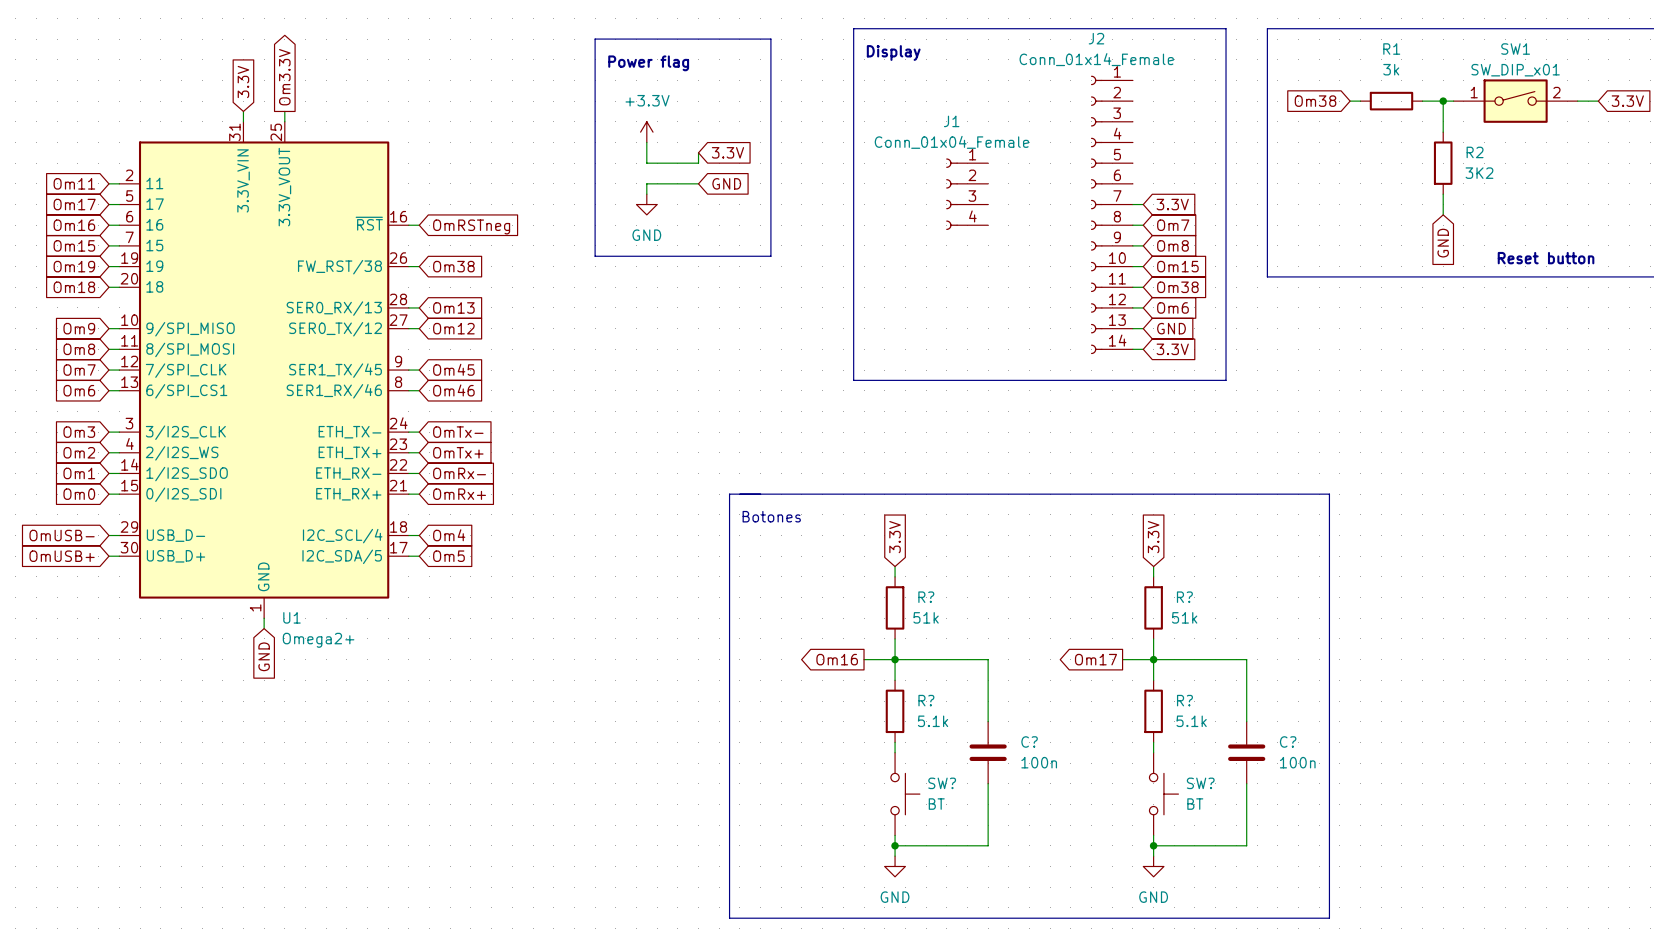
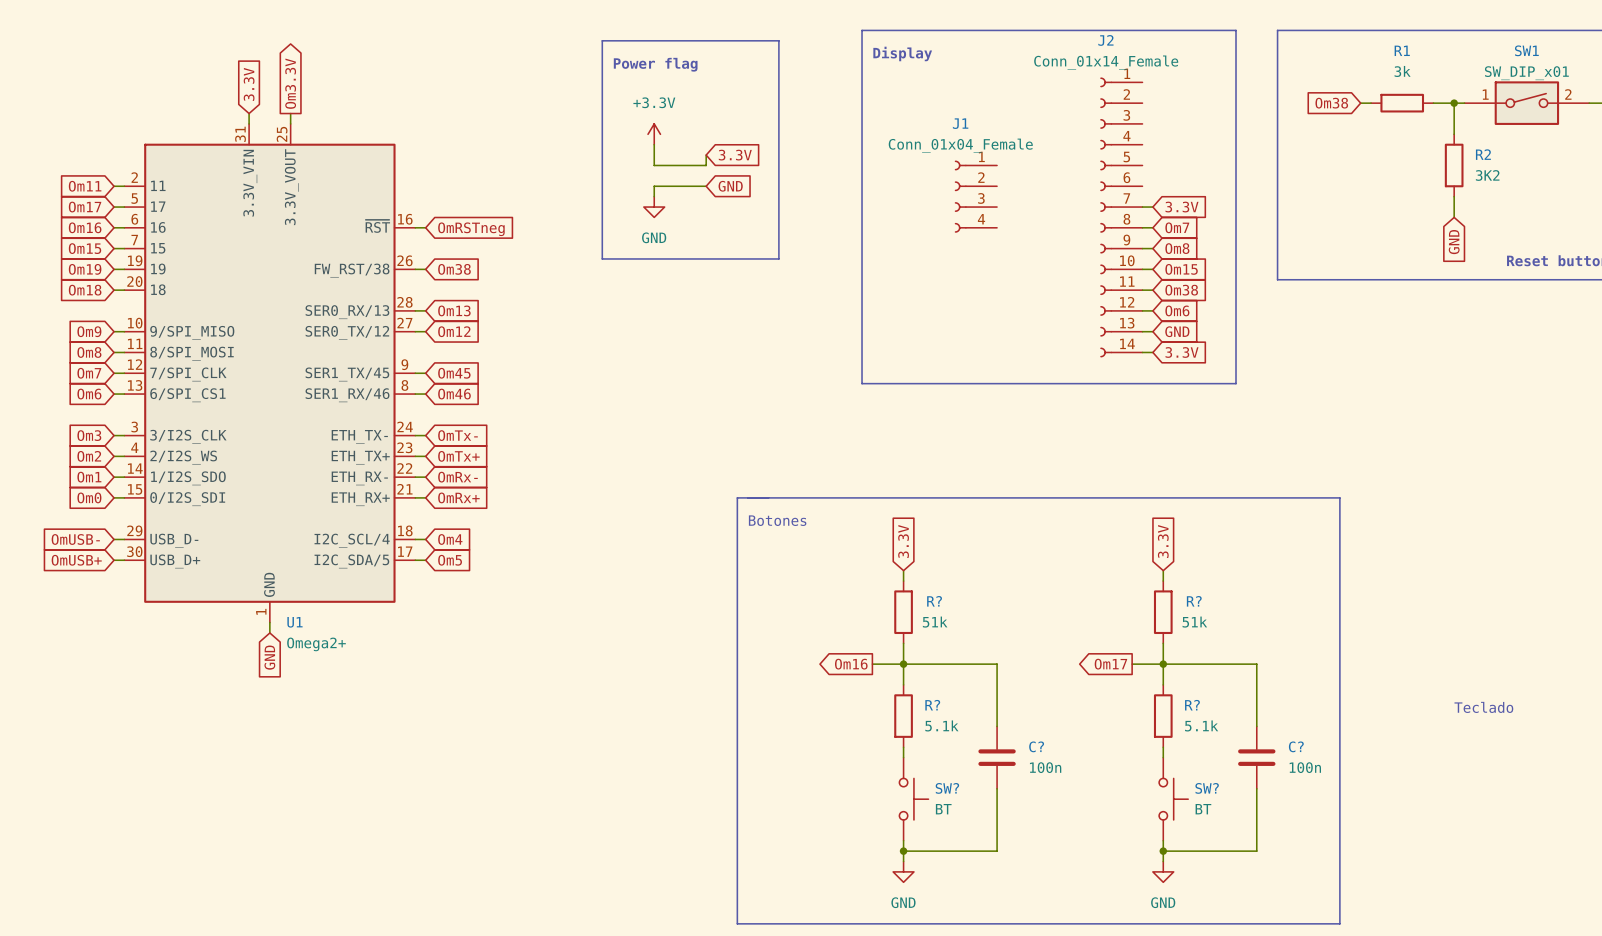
text: none -> Teclado (1483, 707)

